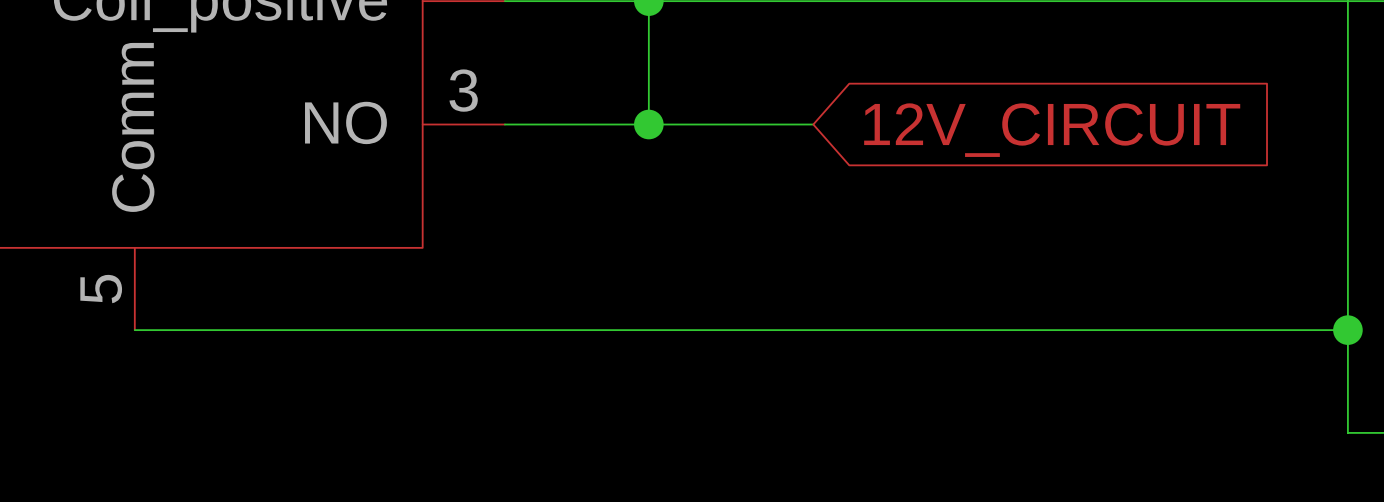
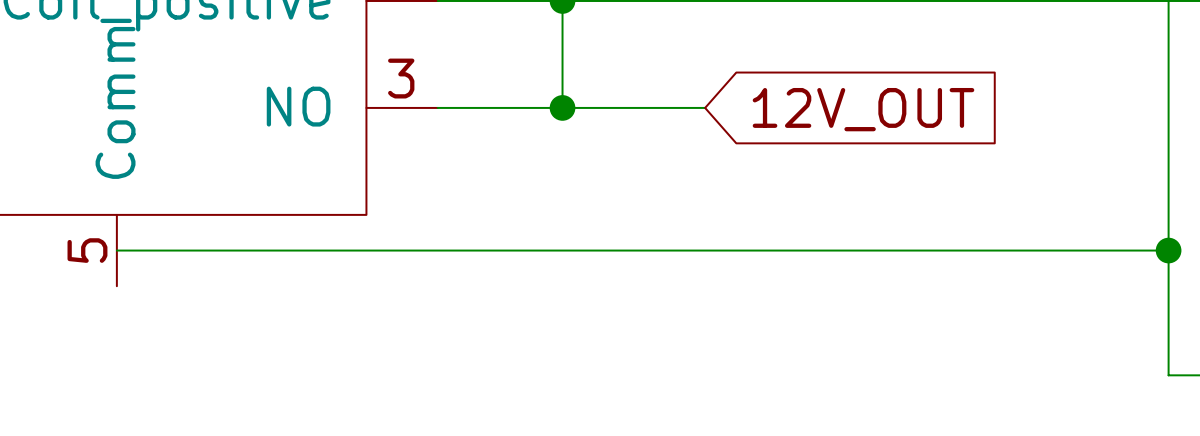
global label: 12V_CIRCUIT (1052, 130) -> 12V_OUT (863, 109)
wire: (134, 330) (1347, 330) -> (116, 250) (1168, 250)
junction position: (1347, 330) -> (1168, 250)

